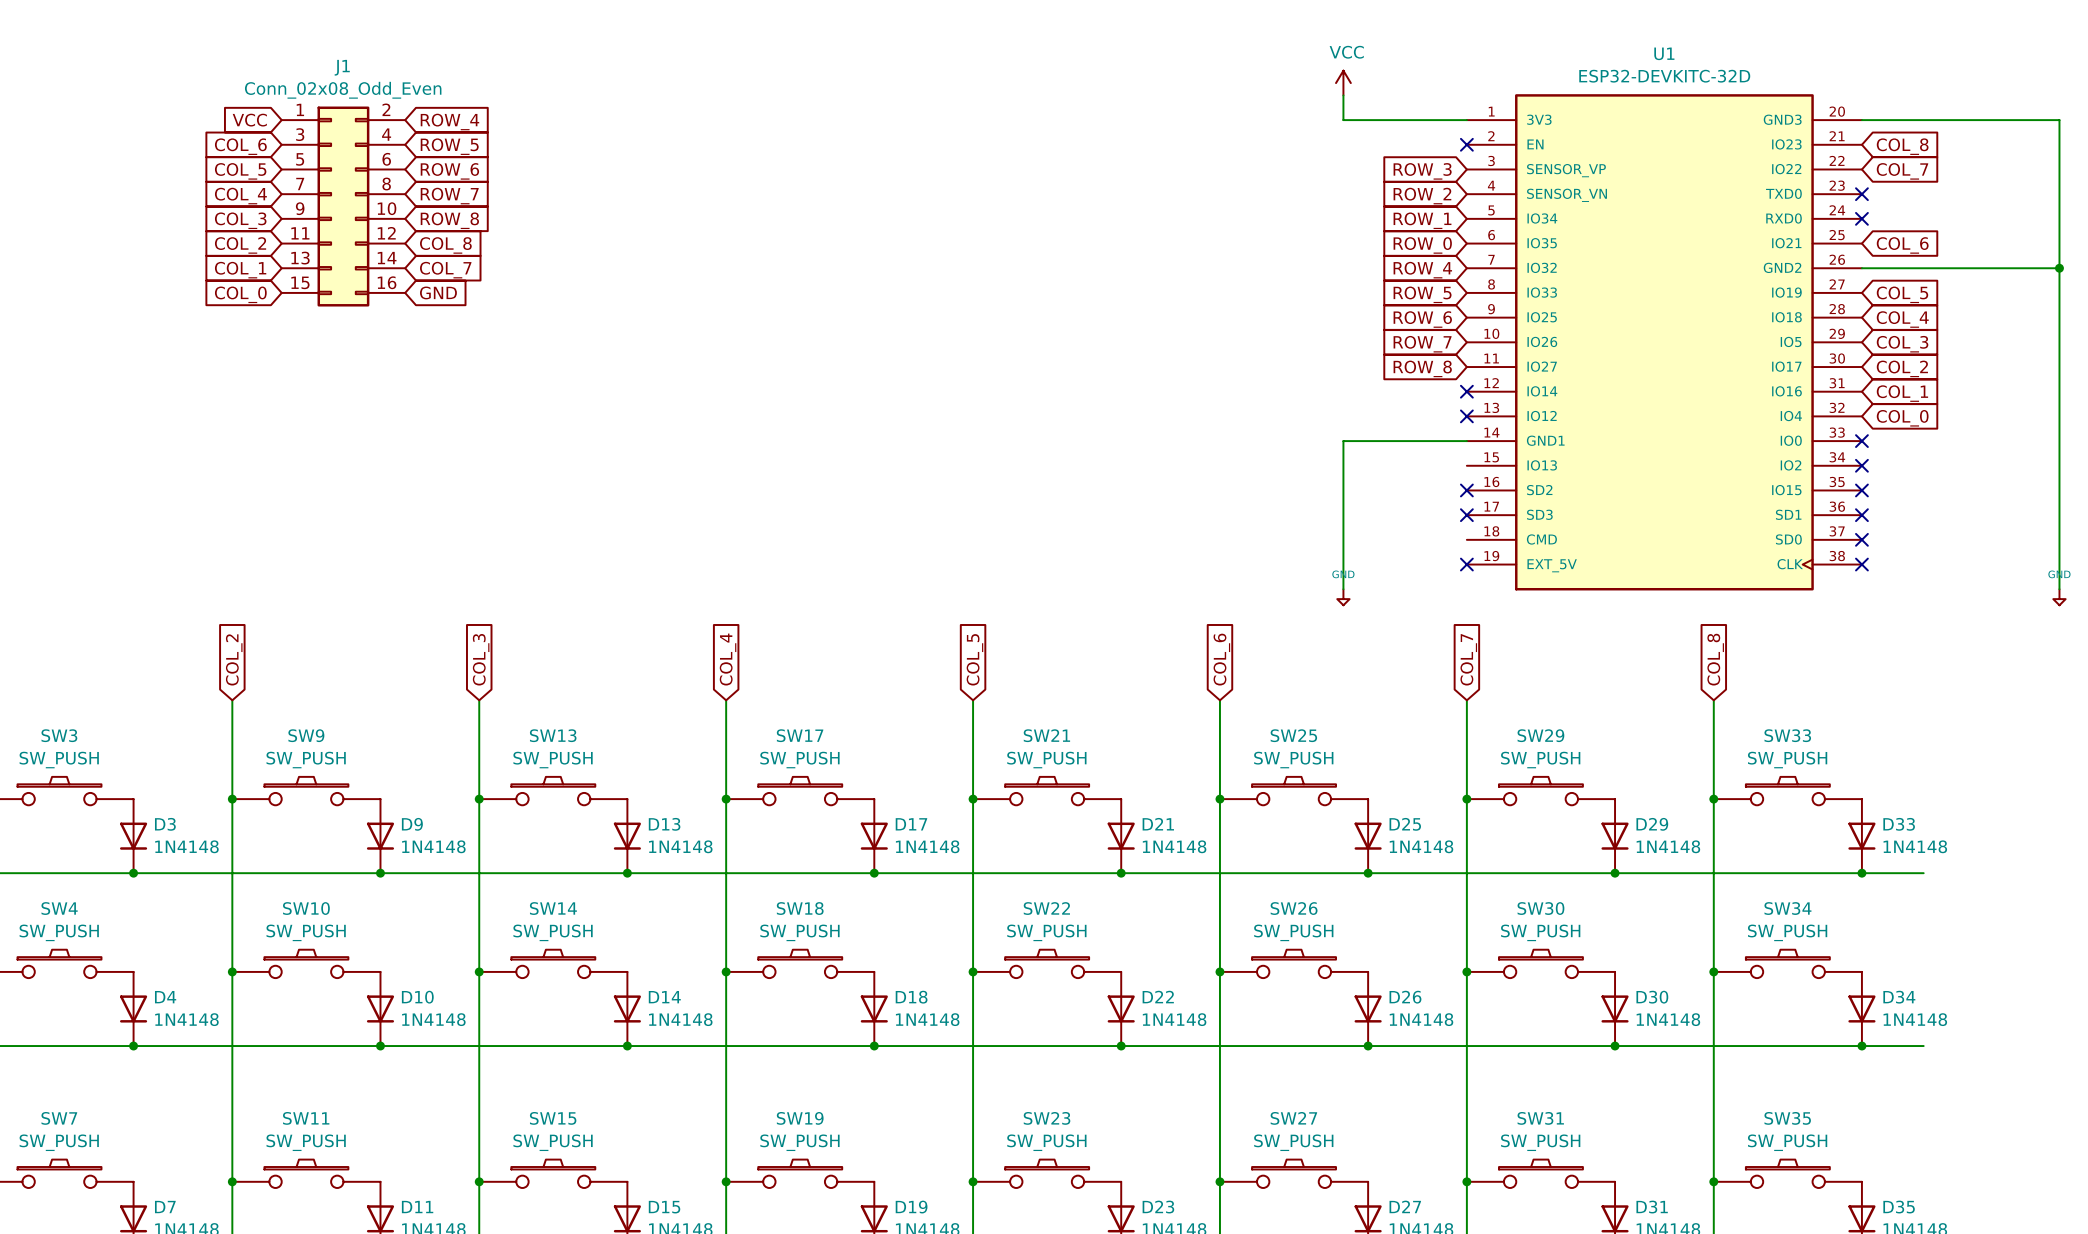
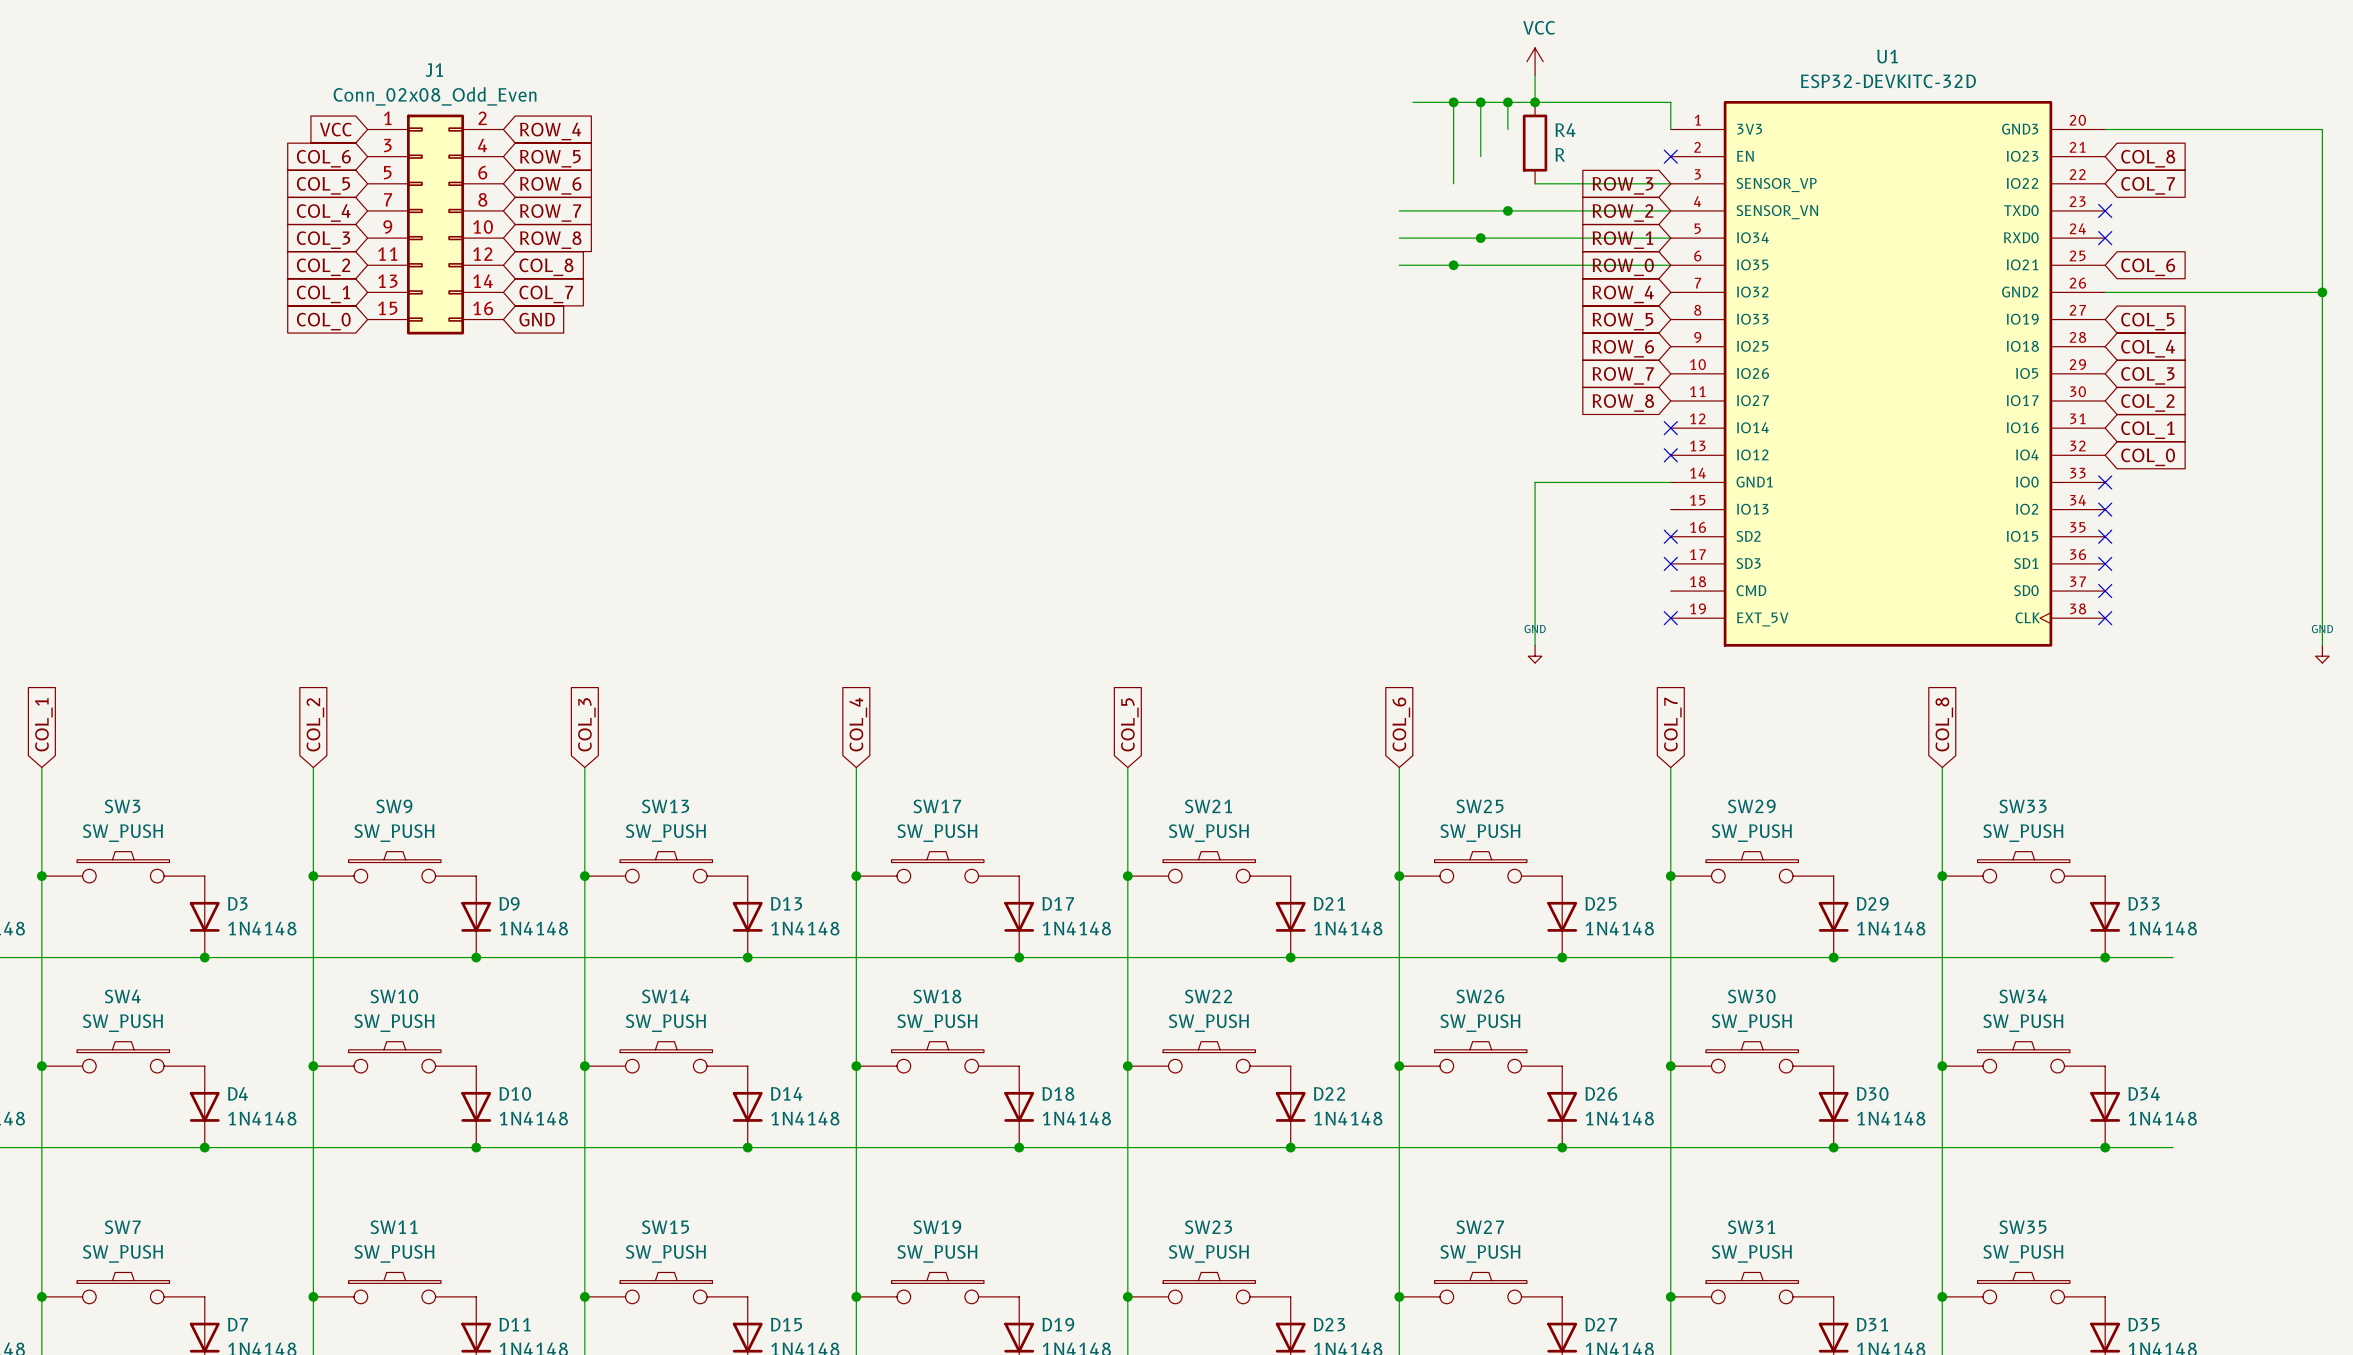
power symbol position: VCC (1343, 83) -> VCC (1535, 61)
wire: none -> (1453, 102) (1453, 183)
junction: none -> (1453, 102)
wire: none -> (1480, 102) (1480, 156)
junction: none -> (1480, 102)
wire: none -> (1507, 102) (1507, 129)
junction: none -> (1507, 102)
wire: (1343, 95) (1343, 120) (1466, 120) -> (1412, 102) (1670, 102) (1670, 129)
junction: none -> (1535, 102)
R4: none -> R (1535, 143)
wire: none -> (1535, 183) (1670, 183)
wire: none -> (1399, 210) (1670, 210)
junction: none -> (1507, 210)
wire: none -> (1399, 238) (1670, 238)
junction: none -> (1480, 238)
wire: none -> (1399, 265) (1670, 265)
junction: none -> (1453, 265)

